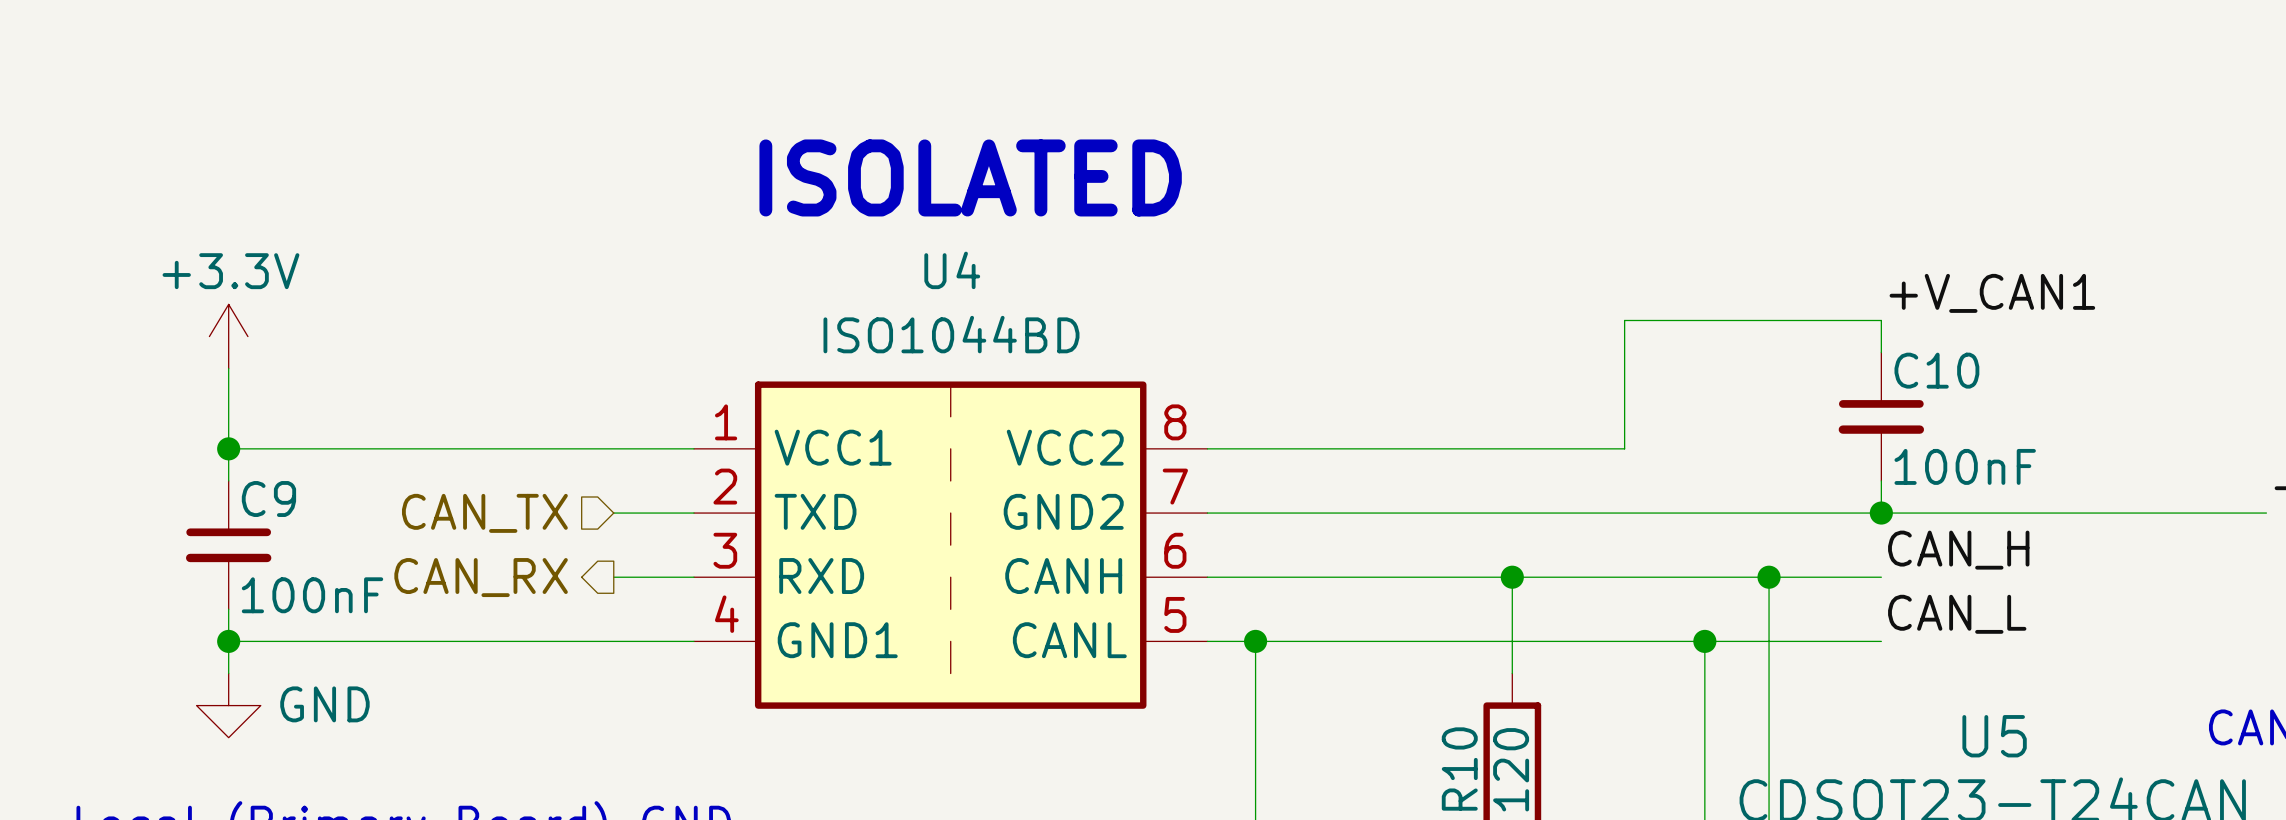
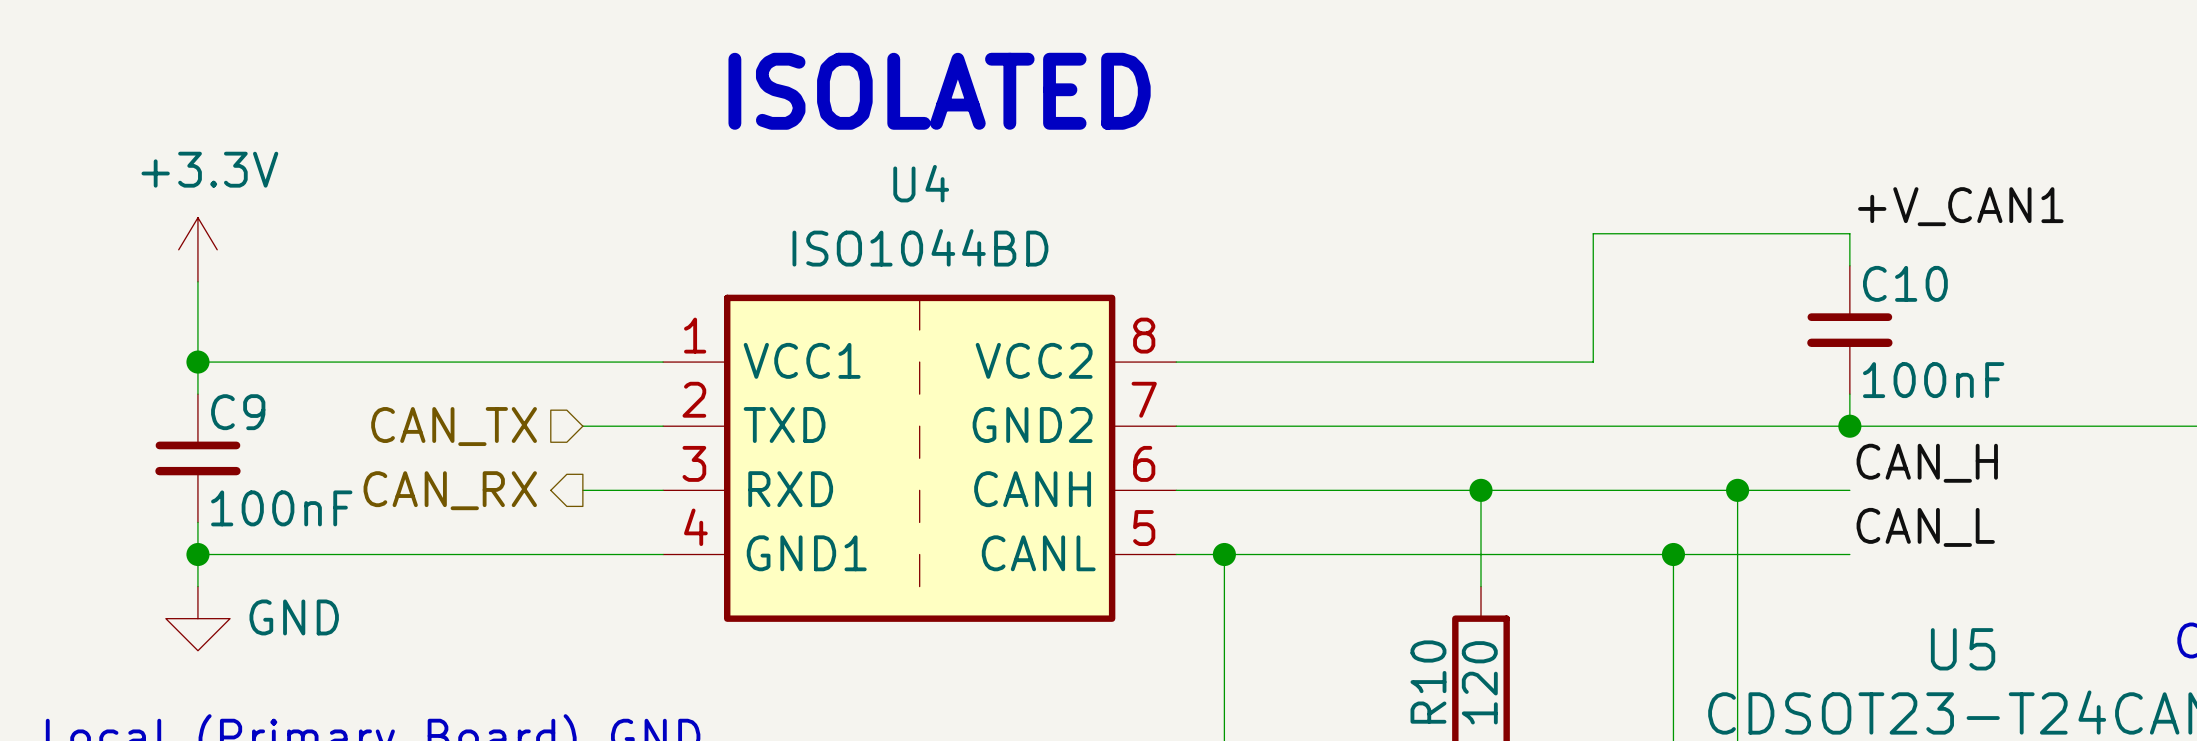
power symbol text position: +3.3V (230, 271) -> +3.3V (209, 169)

